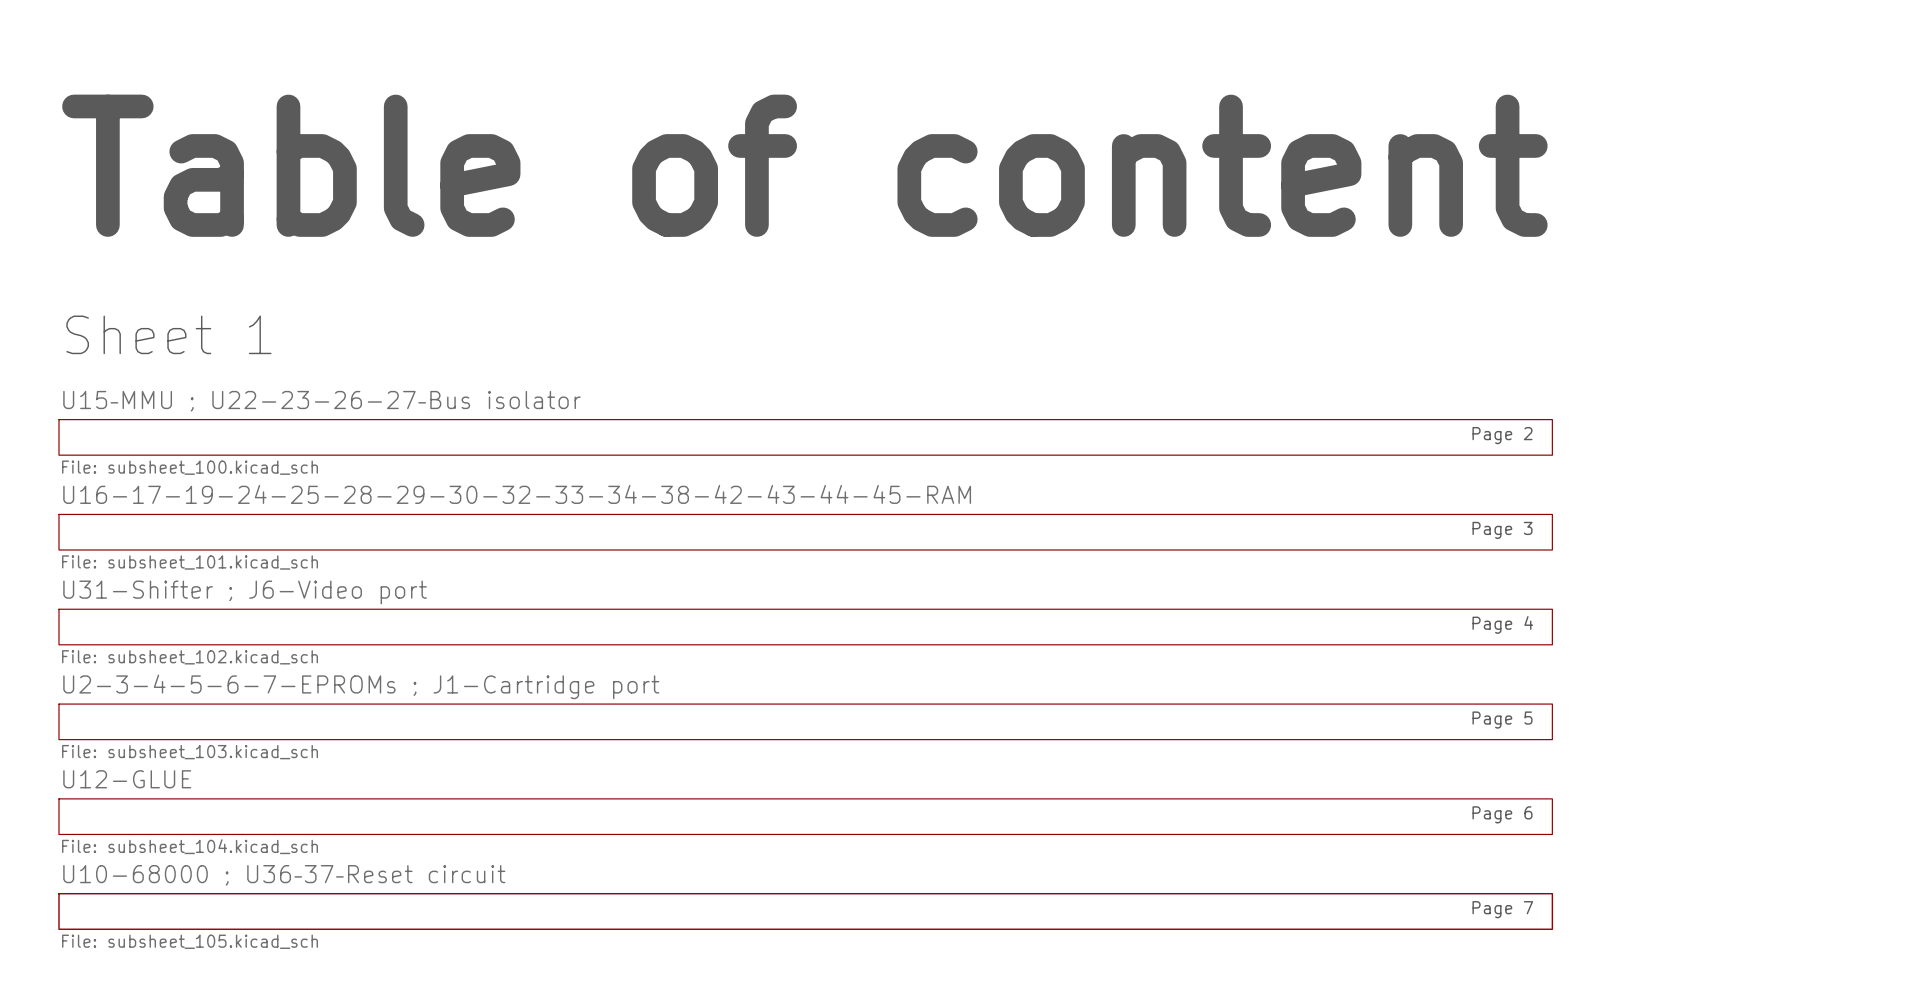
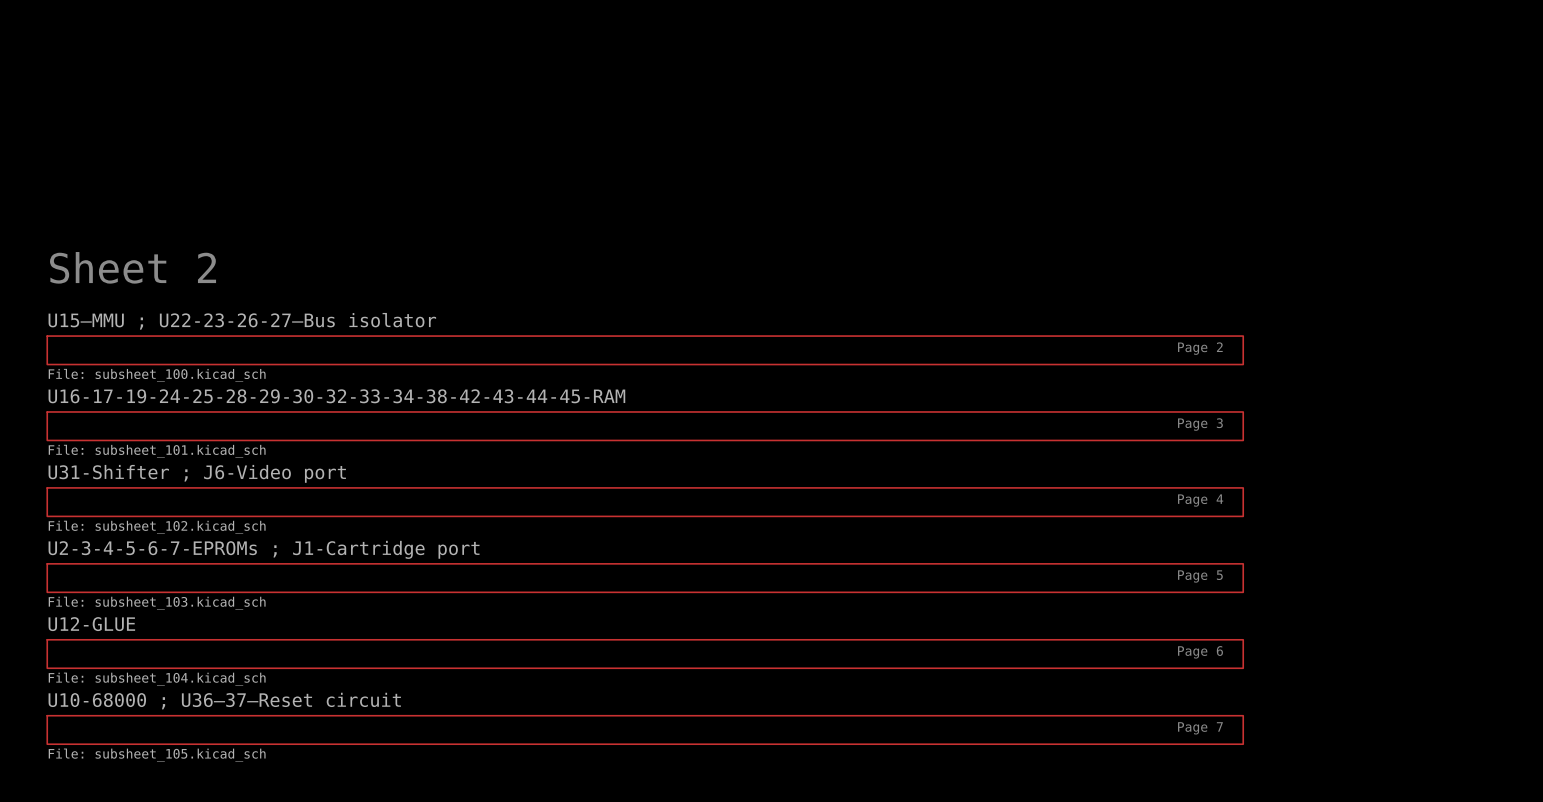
text: Table of content (804, 165) -> none
text: Sheet 1 (168, 334) -> Sheet 2 (133, 267)

